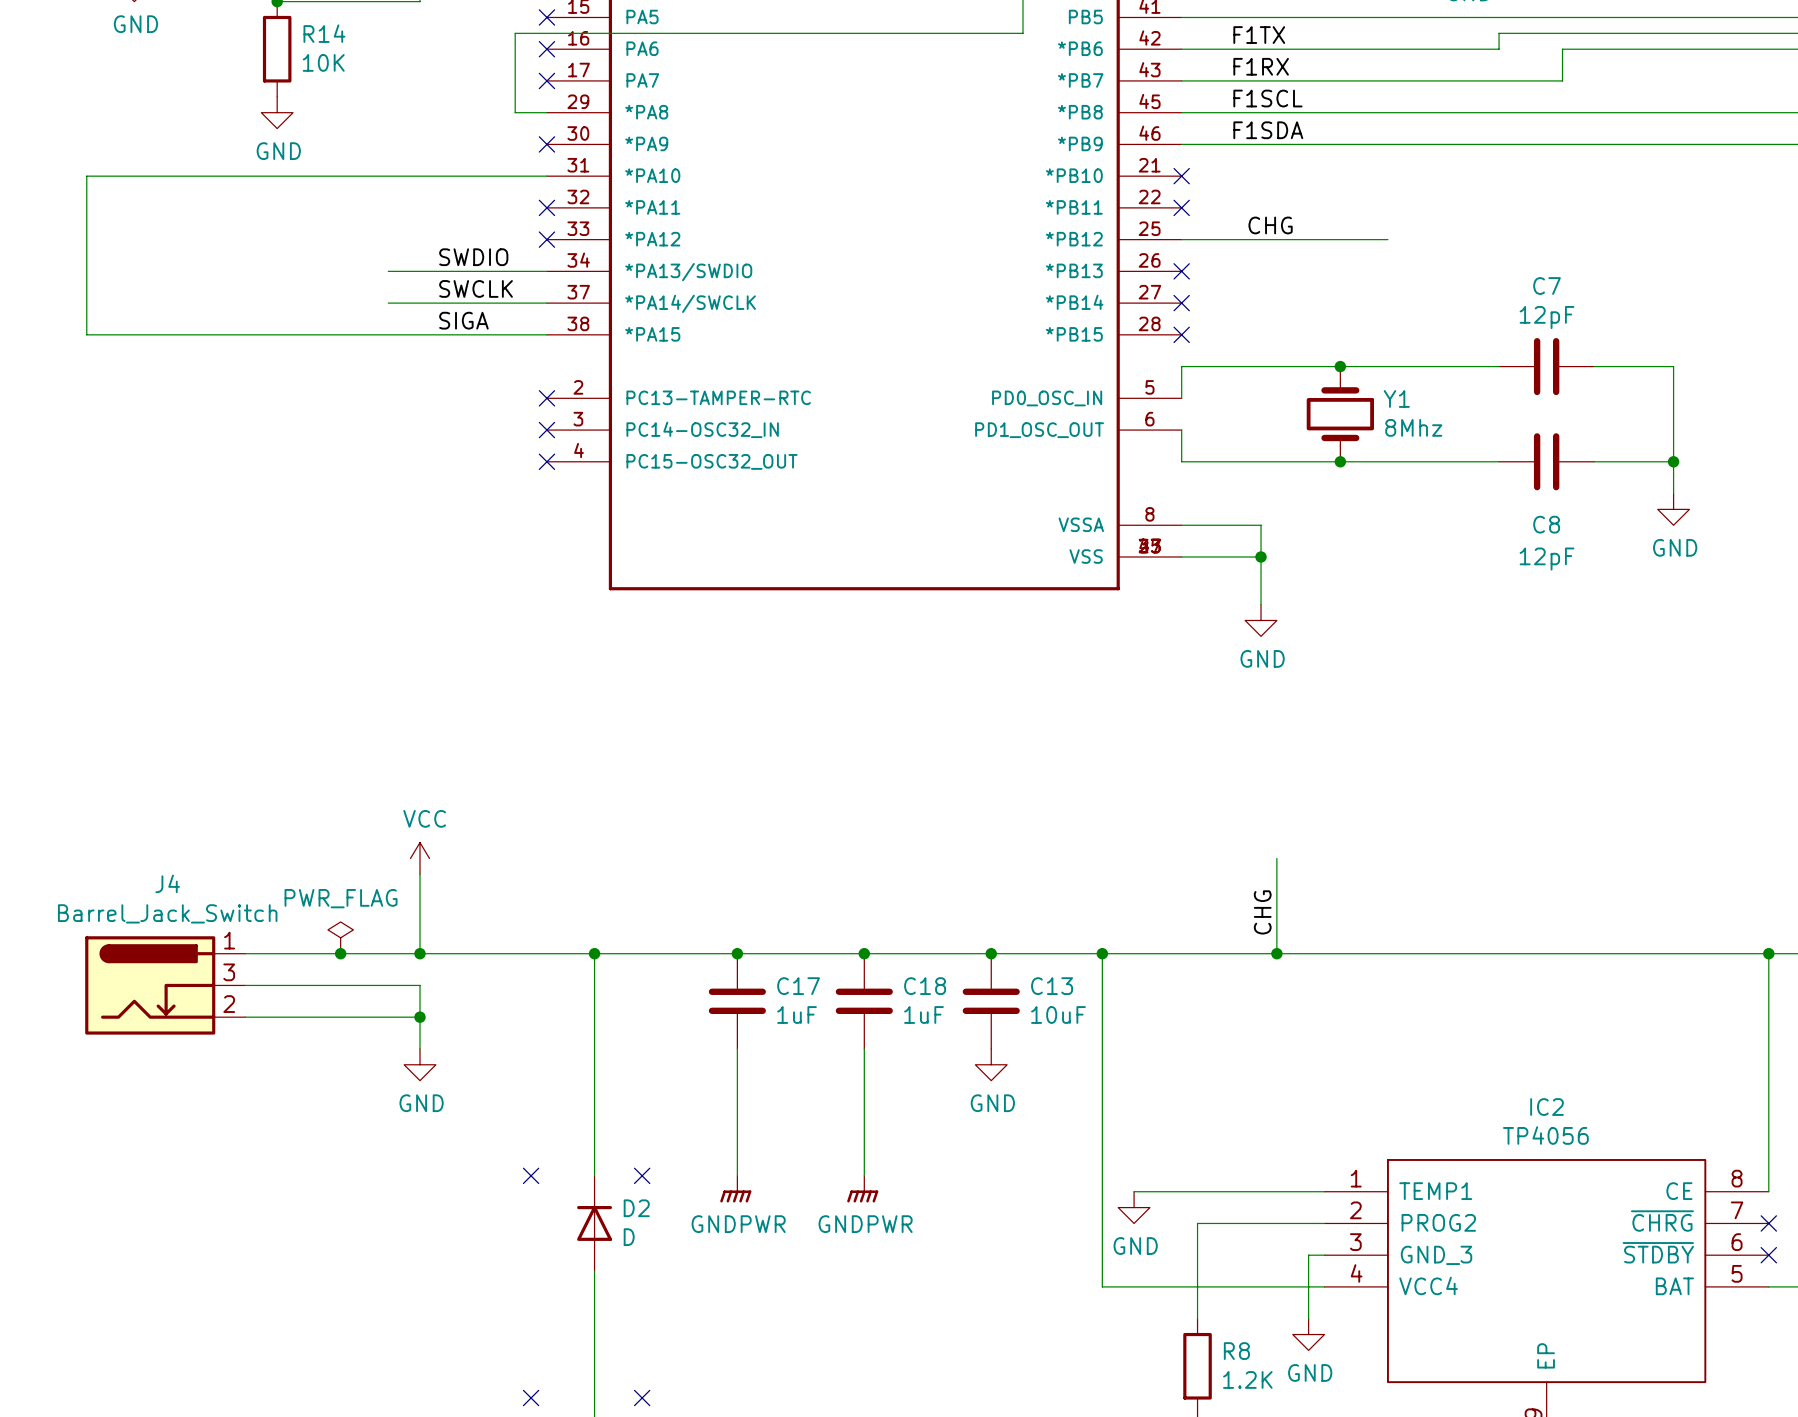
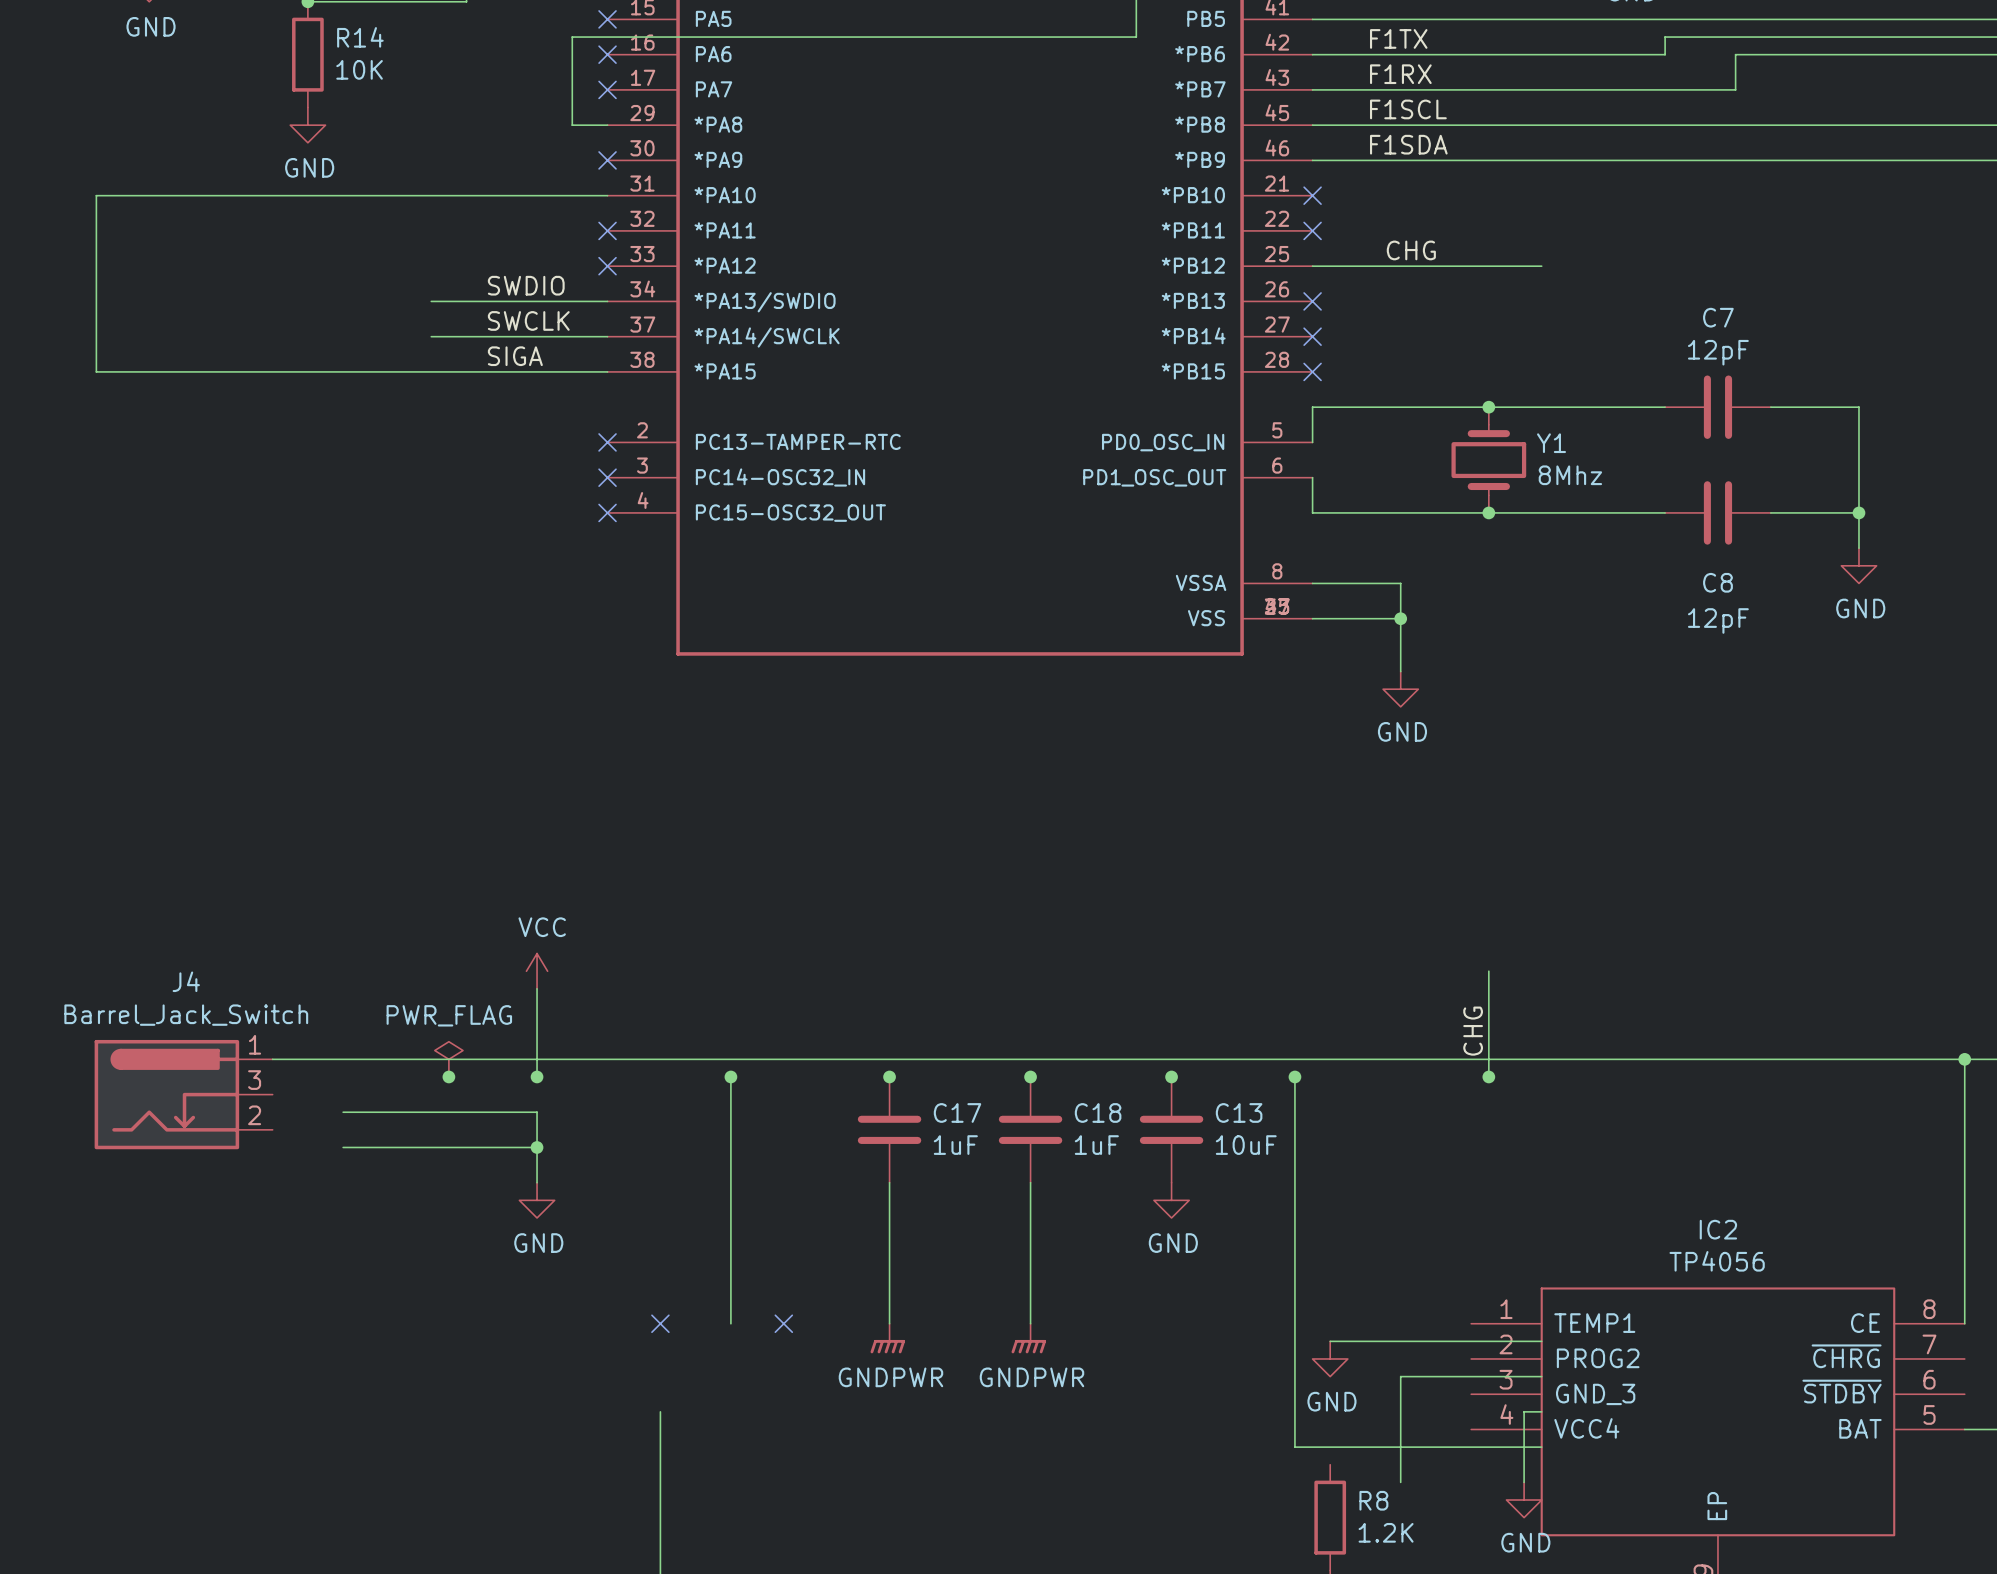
power symbol position: VCC (420, 858) -> VCC (537, 971)
wire: (1276, 858) (1276, 953) -> (1488, 971) (1488, 1076)
wire: (420, 874) (420, 953) -> (537, 988) (537, 1076)
label position: CHG (1262, 912) -> CHG (1473, 1031)
power symbol position: PWR_FLAG (340, 937) -> PWR_FLAG (448, 1059)
junction: (340, 953) -> none
junction position: (420, 953) -> (448, 1076)
wire: (594, 953) (594, 1175) -> (730, 1076) (730, 1323)
junction: (594, 953) -> none
junction: (737, 953) -> none
junction: (864, 953) -> none
junction: (991, 953) -> none
wire: (1102, 953) (1102, 1286) (1324, 1286) -> (1294, 1076) (1294, 1447) (1541, 1447)
junction: (1102, 953) -> none
junction: (1276, 953) -> none
junction: none -> (537, 1076)
junction: none -> (730, 1076)
junction: none -> (889, 1076)
junction: none -> (1030, 1076)
junction: none -> (1171, 1076)
junction: none -> (1294, 1076)
junction: none -> (1488, 1076)
wire: (245, 985) (420, 985) (420, 1048) -> (343, 1112) (537, 1112) (537, 1182)
C17 position: (737, 1001) -> (889, 1129)
C18 position: (864, 1001) -> (1030, 1129)
C13 position: (991, 1001) -> (1171, 1129)
wire: (245, 1017) (420, 1017) -> (343, 1147) (537, 1147)
junction: (420, 1017) -> none
junction: none -> (537, 1147)
wire: (737, 1048) (737, 1175) -> (889, 1182) (889, 1323)
wire: (864, 1048) (864, 1175) -> (1030, 1182) (1030, 1323)
power symbol position: GND (420, 1064) -> GND (537, 1200)
power symbol position: GND (991, 1064) -> GND (1171, 1200)
no-connect mark: (531, 1175) -> none
no-connect mark: (642, 1175) -> none
power symbol: GNDPWR (735, 1189) -> none
power symbol: GNDPWR (862, 1189) -> none
no-connect mark: none -> (660, 1323)
no-connect mark: none -> (783, 1323)
wire: (1134, 1191) (1324, 1191) -> (1330, 1341) (1541, 1341)
power symbol: none -> GNDPWR (887, 1338)
power symbol: none -> GNDPWR (1028, 1338)
power symbol position: GND (1134, 1207) -> GND (1330, 1358)
D2: D (594, 1223) -> none
wire: (1324, 1223) (1197, 1223) (1197, 1318) -> (1541, 1376) (1400, 1376) (1400, 1482)
no-connect mark: (1768, 1223) -> none
wire: (1324, 1255) (1308, 1255) (1308, 1318) -> (1541, 1411) (1524, 1411) (1524, 1482)
no-connect mark: (1768, 1255) -> none
power symbol: GND (1308, 1334) -> none
power symbol: none -> GND (1524, 1500)
no-connect mark: (531, 1398) -> none
no-connect mark: (642, 1398) -> none

